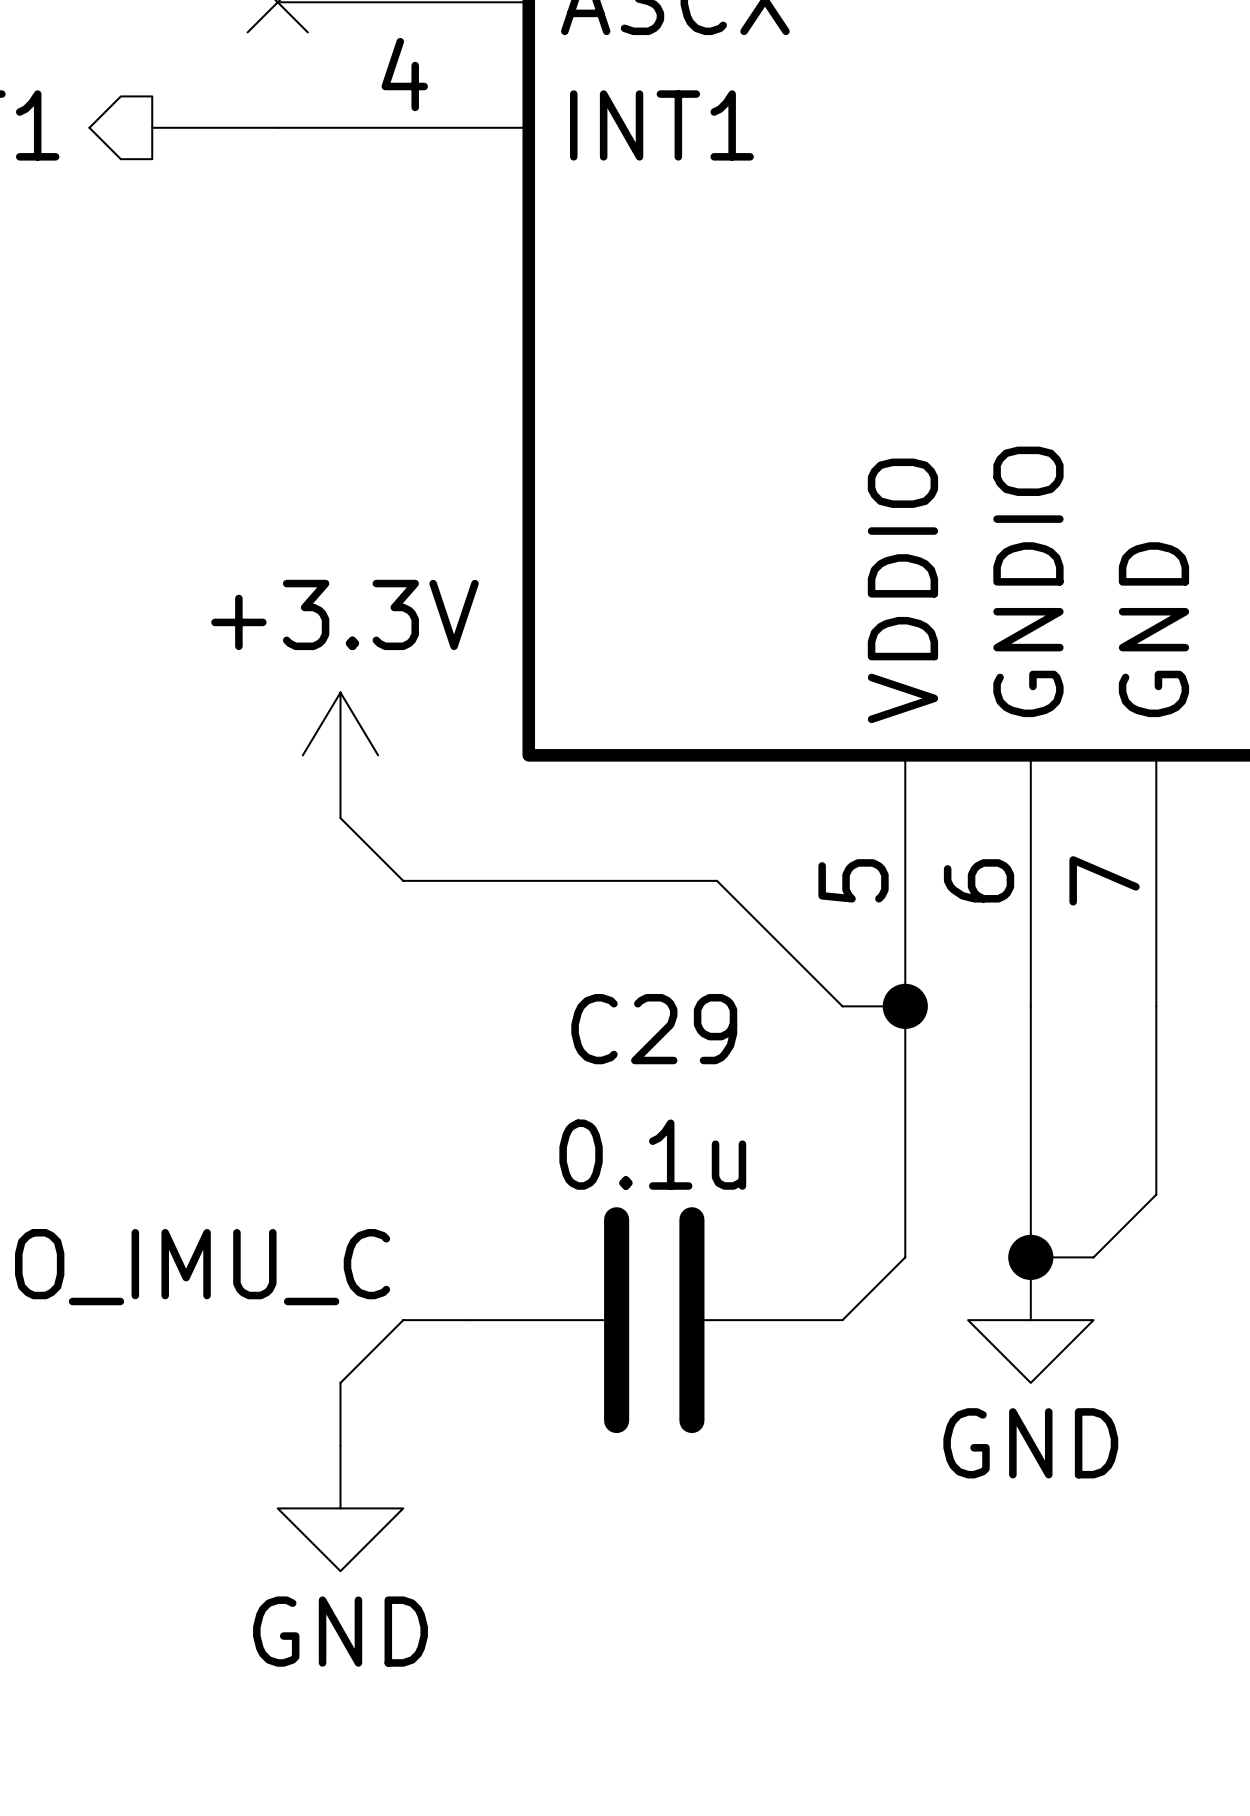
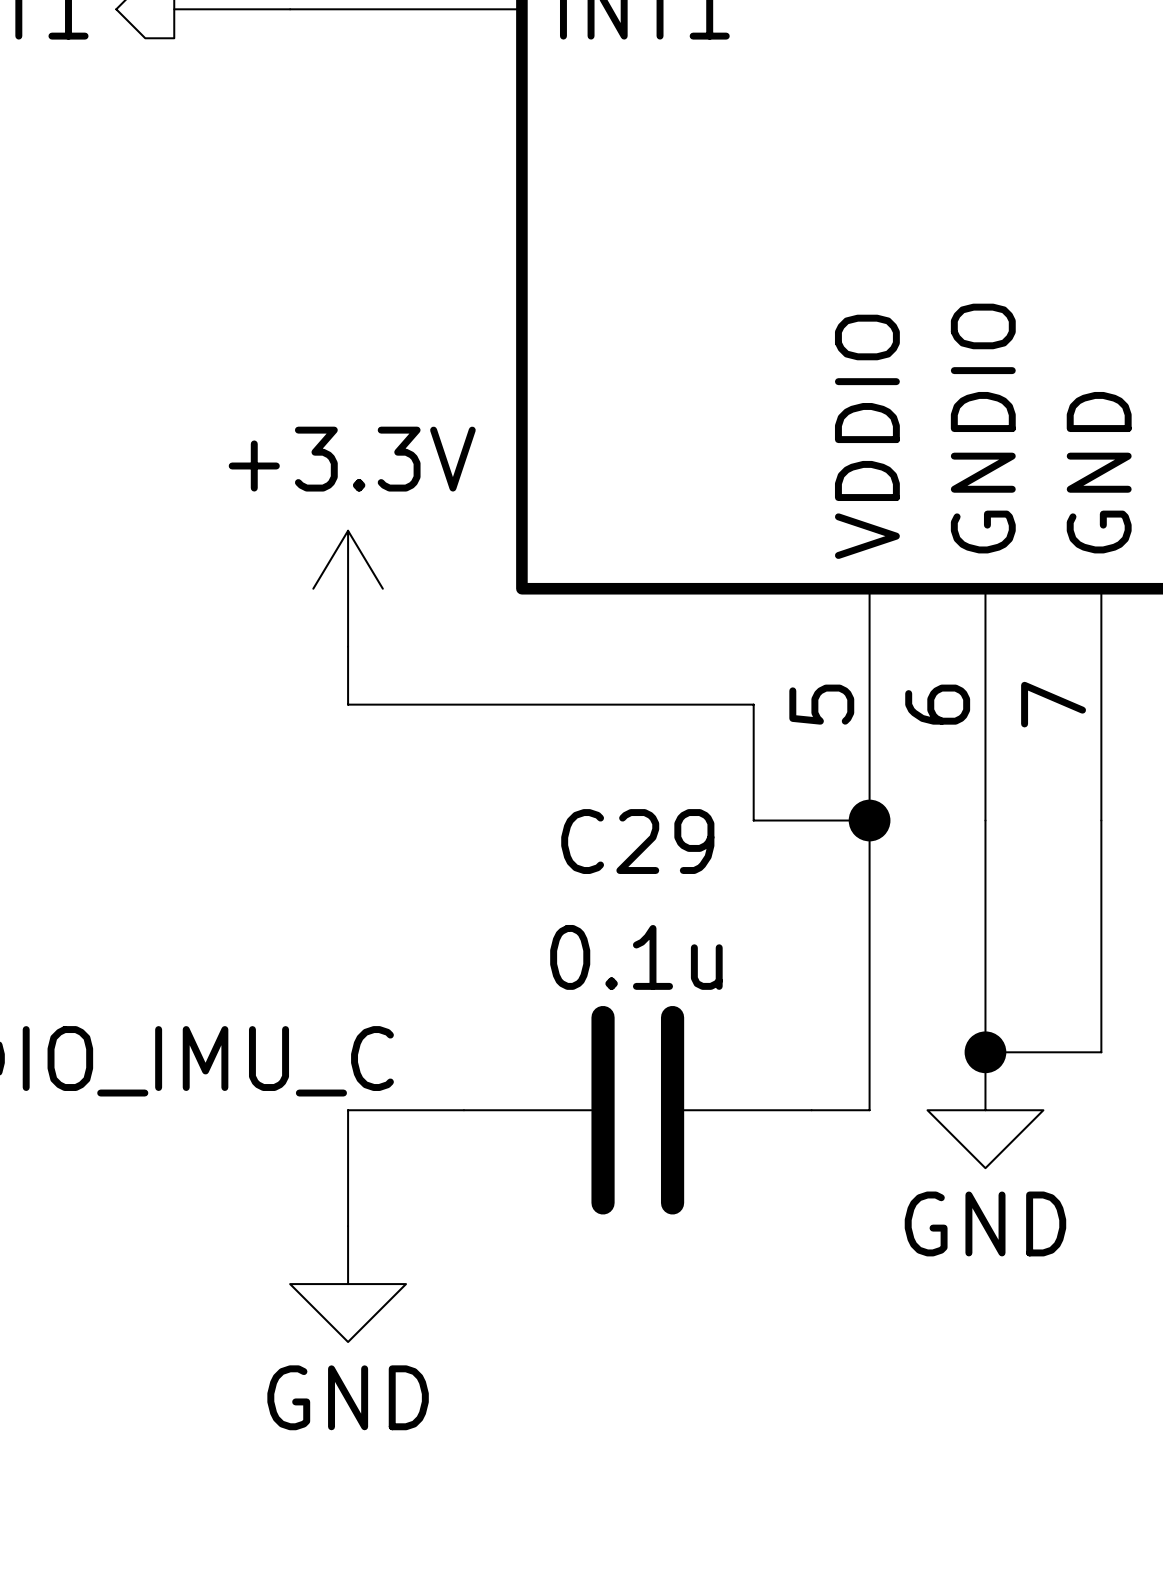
wire: (340, 818) (403, 880) -> (348, 646) (348, 704) (406, 704)
wire: (717, 880) (842, 1006) -> (695, 704) (753, 704) (753, 820) (811, 820)
wire: (1156, 1194) (1093, 1257) -> (1101, 994) (1101, 1052) (1043, 1052)
wire: (905, 1257) (842, 1320) -> (869, 1052) (869, 1110) (811, 1110)
wire: (403, 1320) (340, 1382) -> (406, 1110) (348, 1110) (348, 1168)

